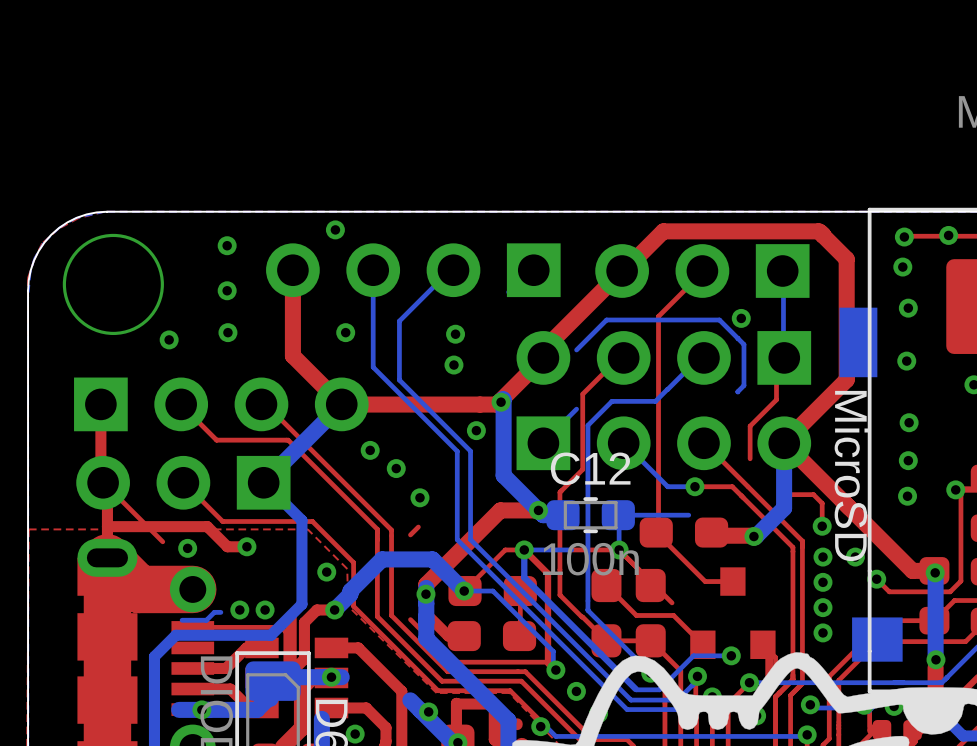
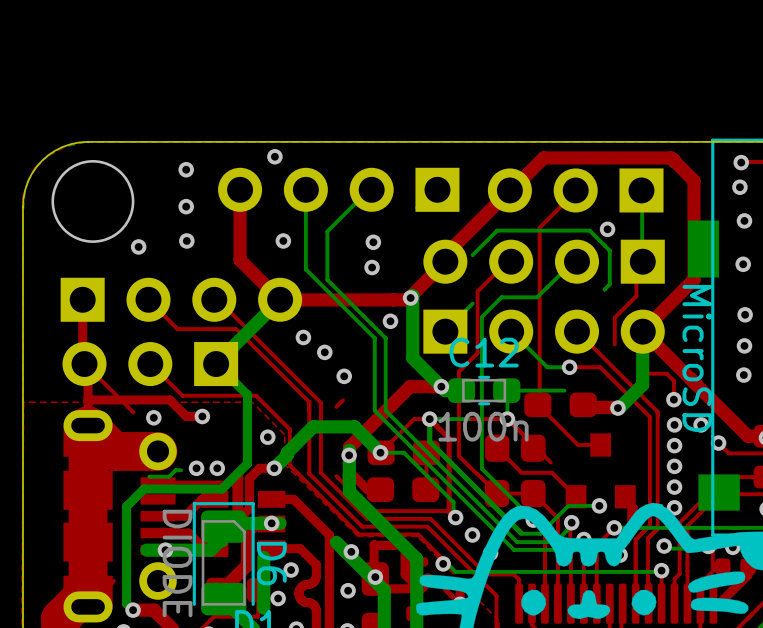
via: none -> (674, 507)

